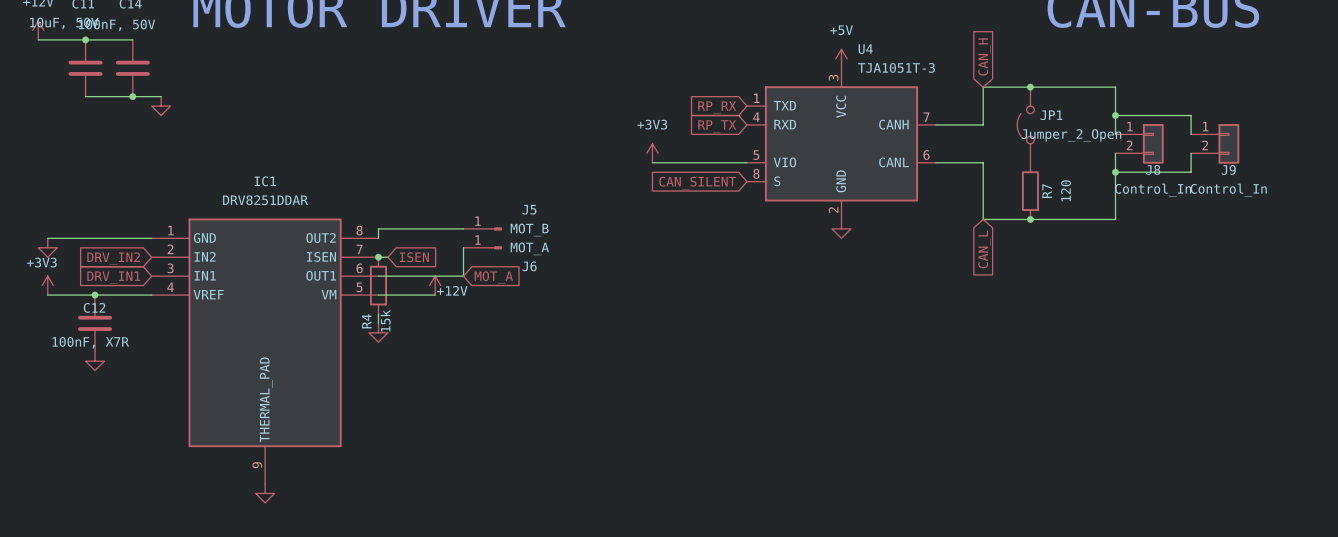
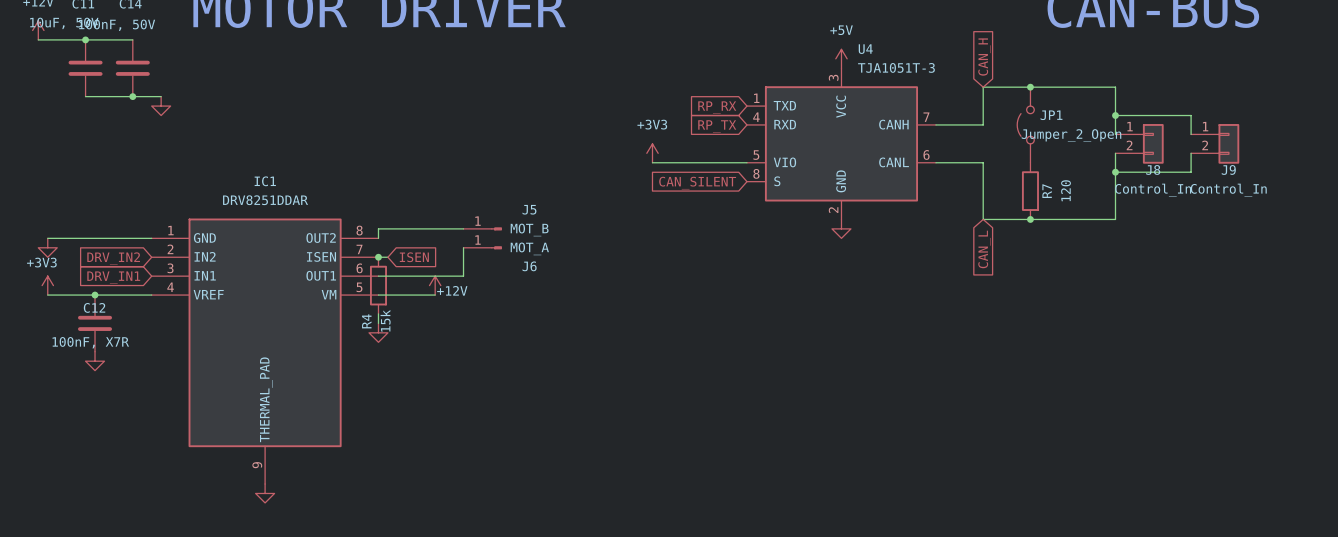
global label: MOT_A (493, 277) -> none

